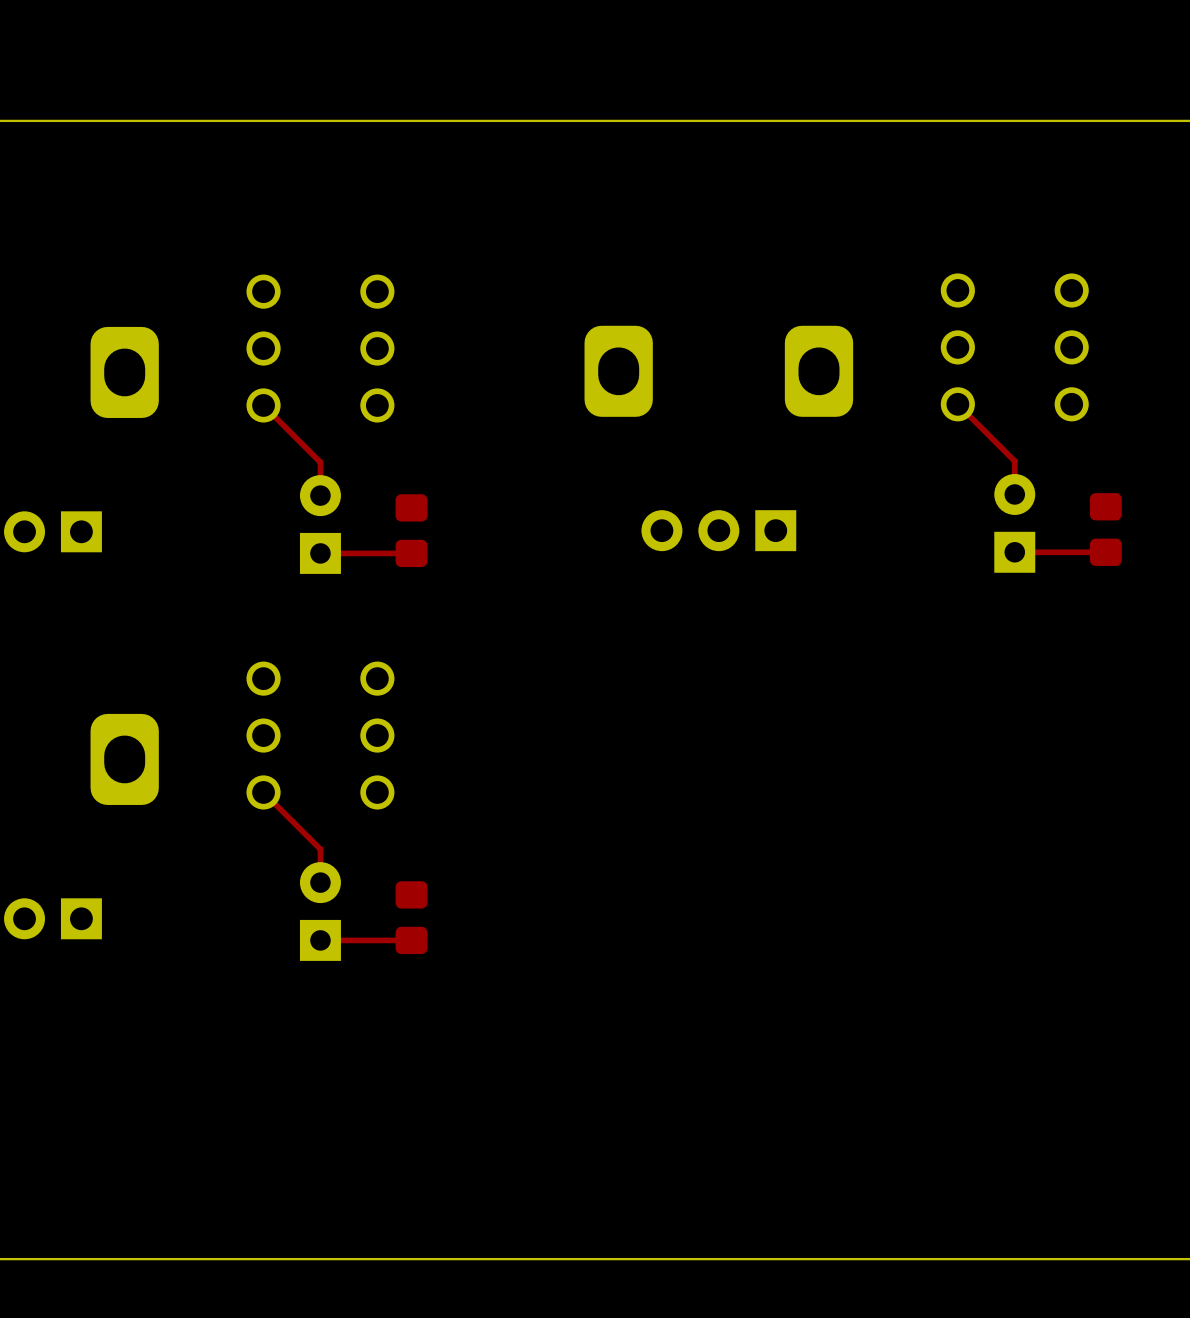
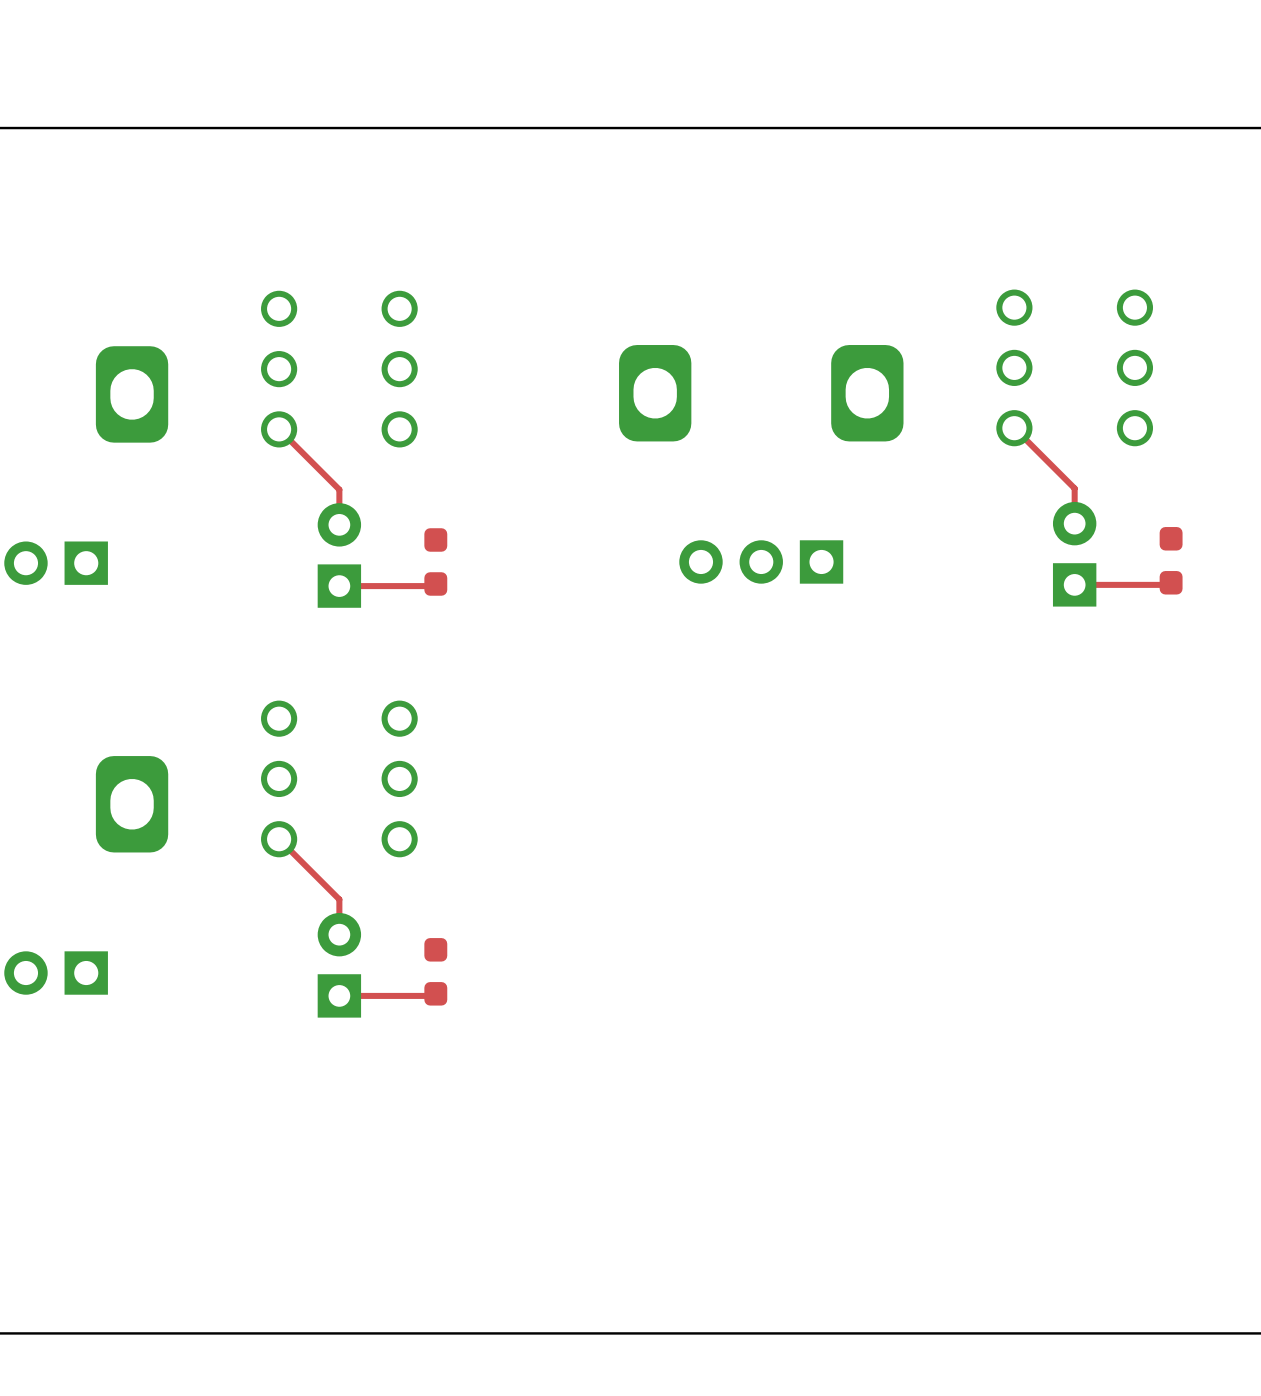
part footprint: [1089, 493, 1122, 566] -> [1159, 527, 1183, 595]
part footprint: [395, 494, 428, 568] -> [424, 528, 448, 596]
part footprint: [395, 881, 428, 955] -> [424, 938, 448, 1006]

